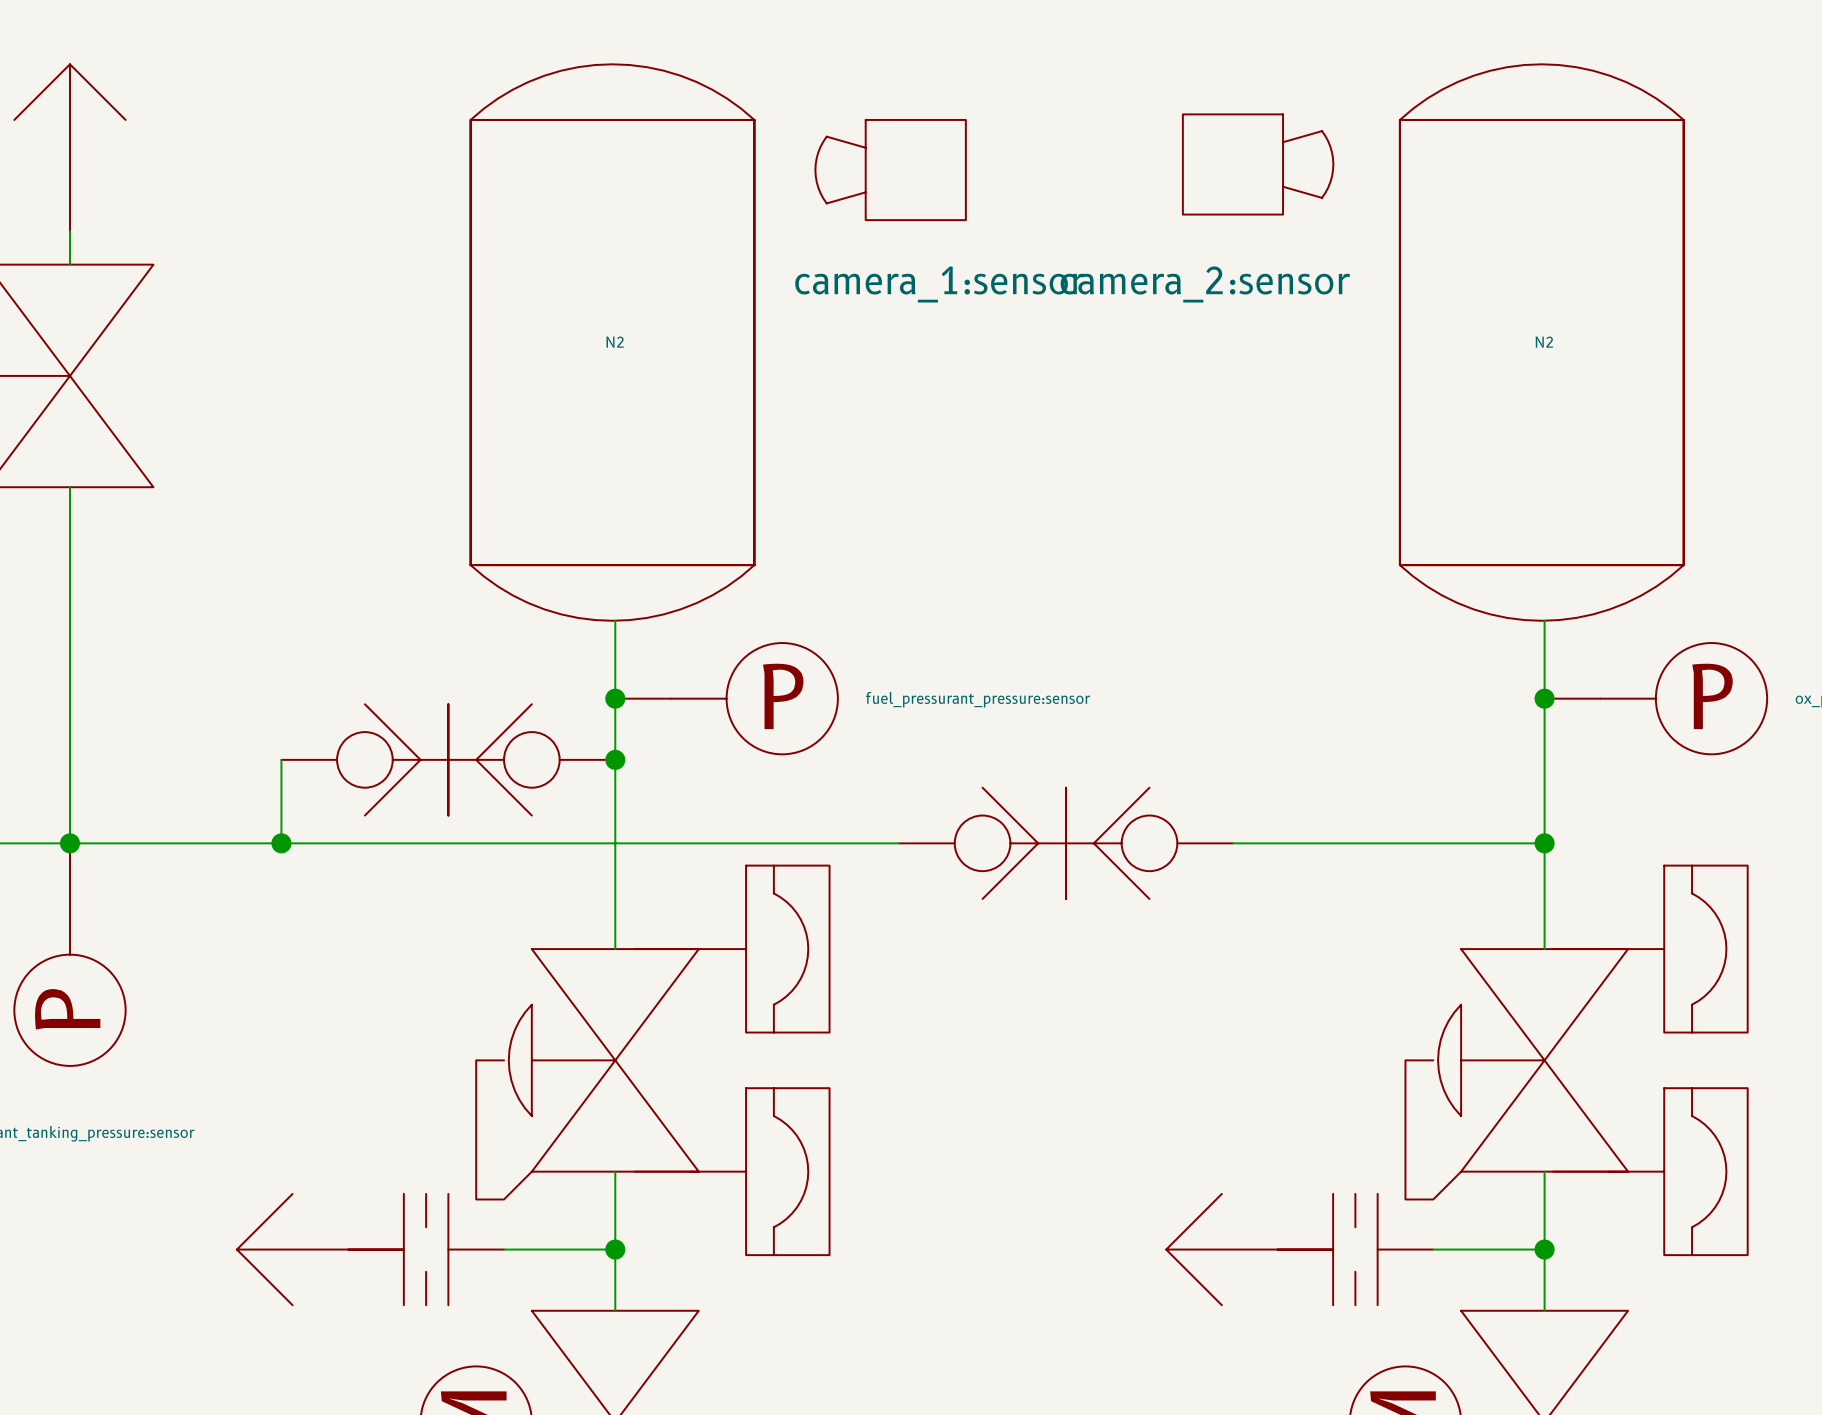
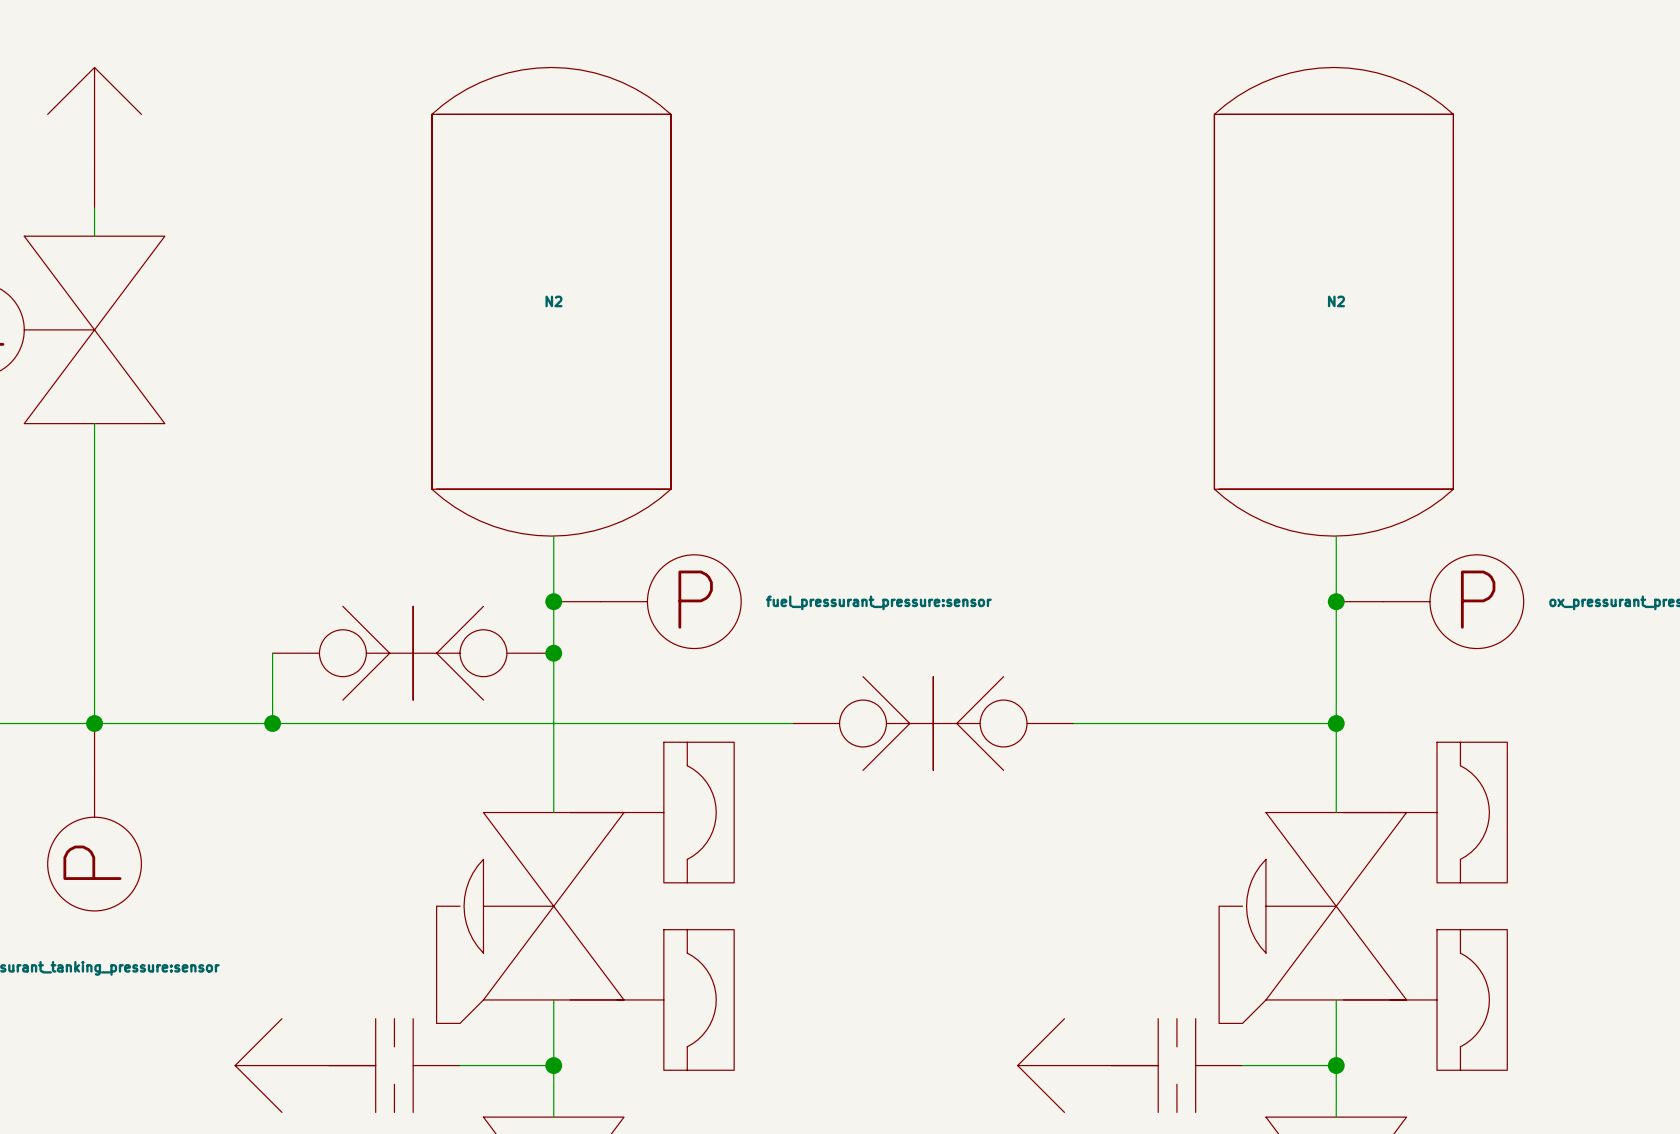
part: camera_2:sensor (1258, 164) -> none
part: camera_1:sensor (890, 170) -> none

